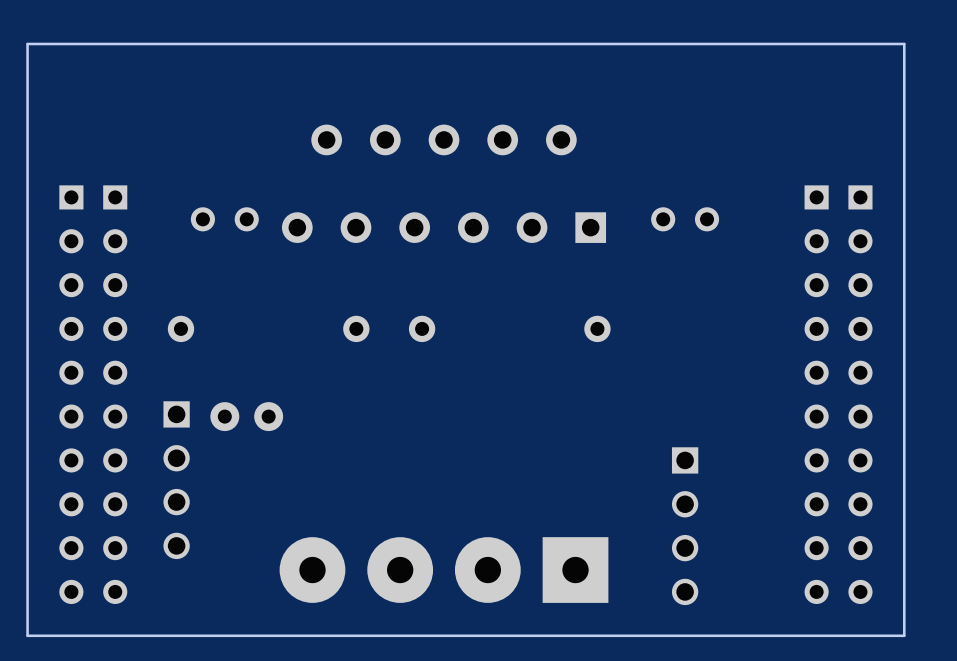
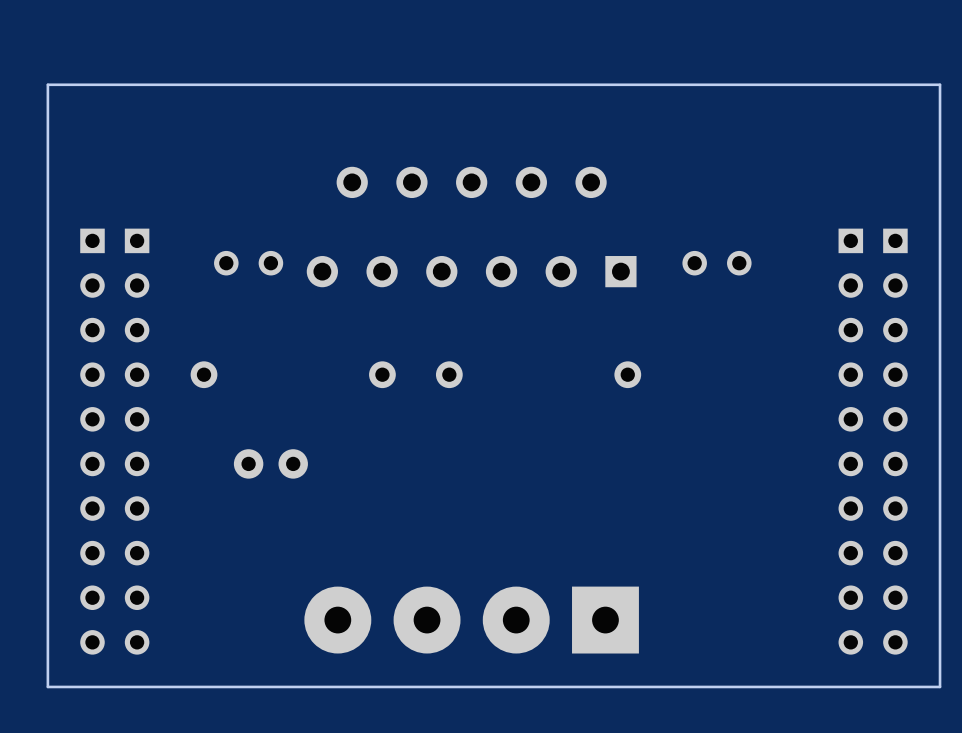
part: (176, 480) -> none
part: (685, 526) -> none

